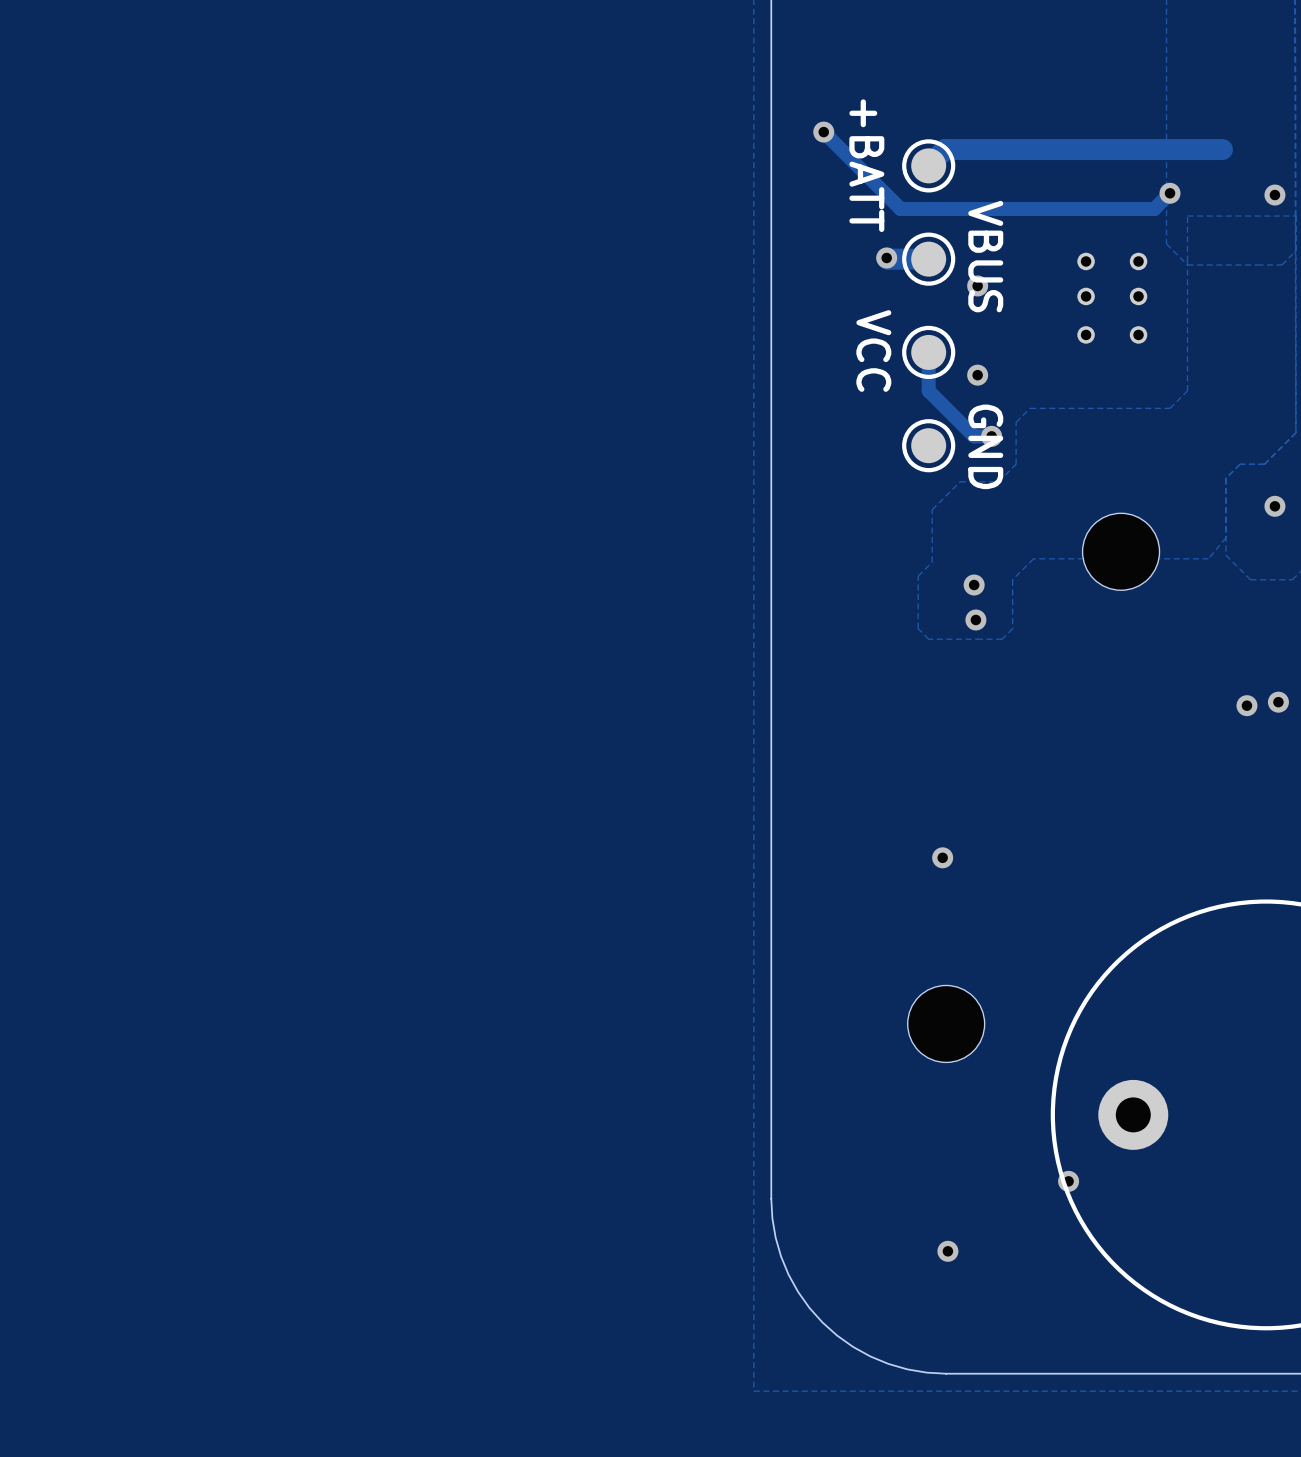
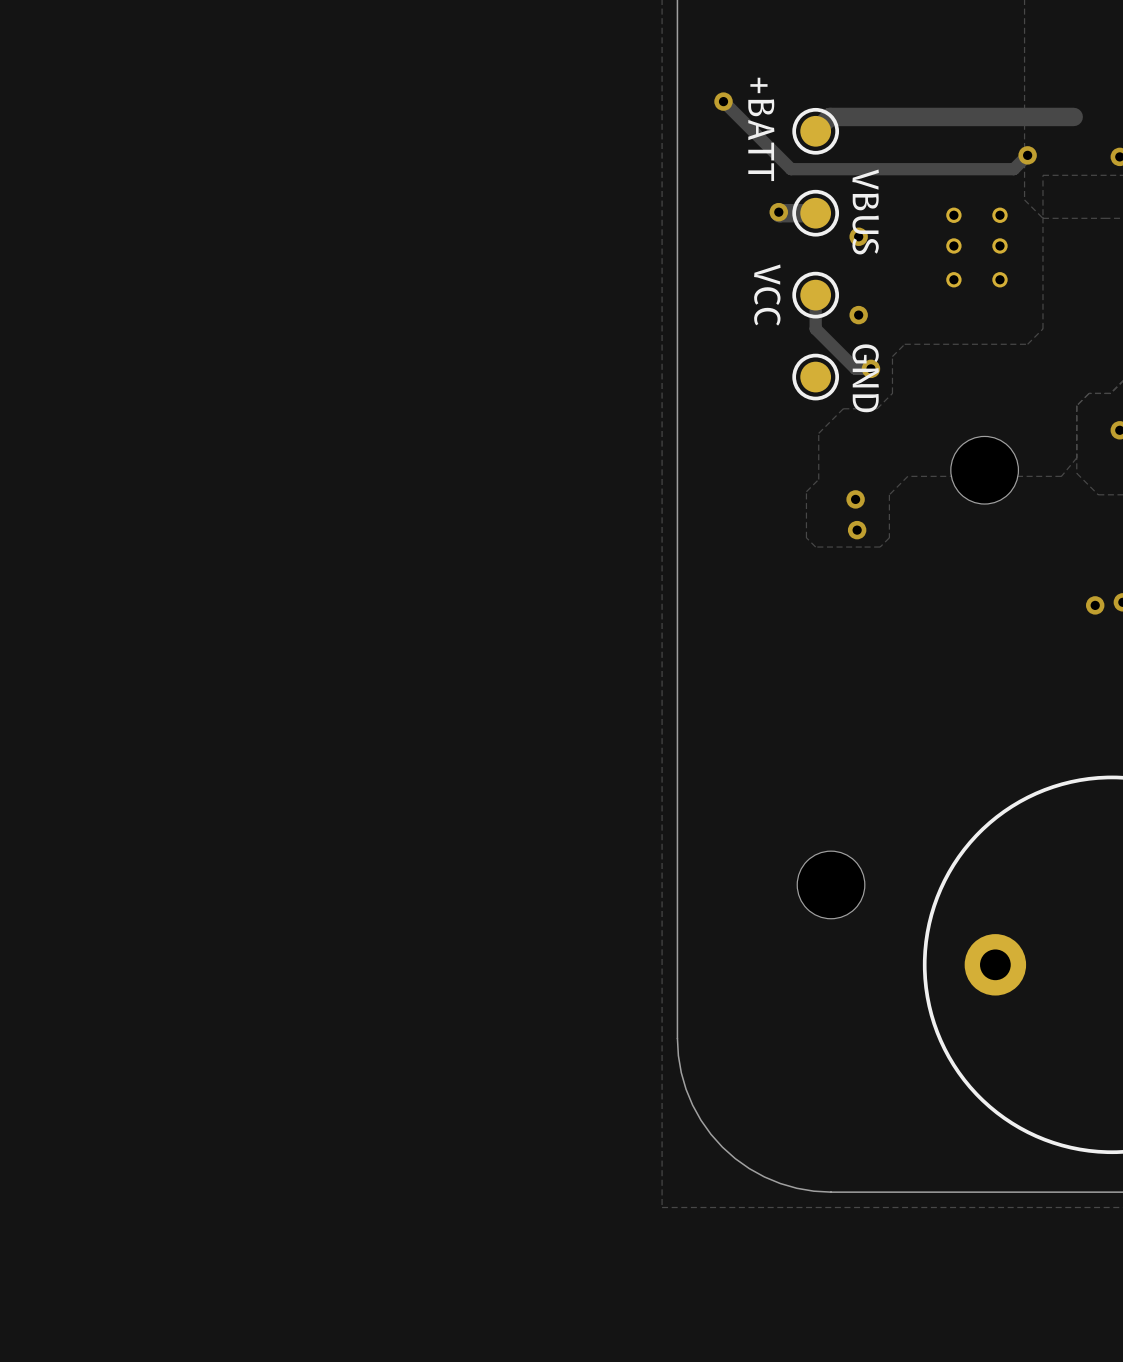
via: (942, 857) -> none
via: (1068, 1181) -> none
via: (947, 1251) -> none

